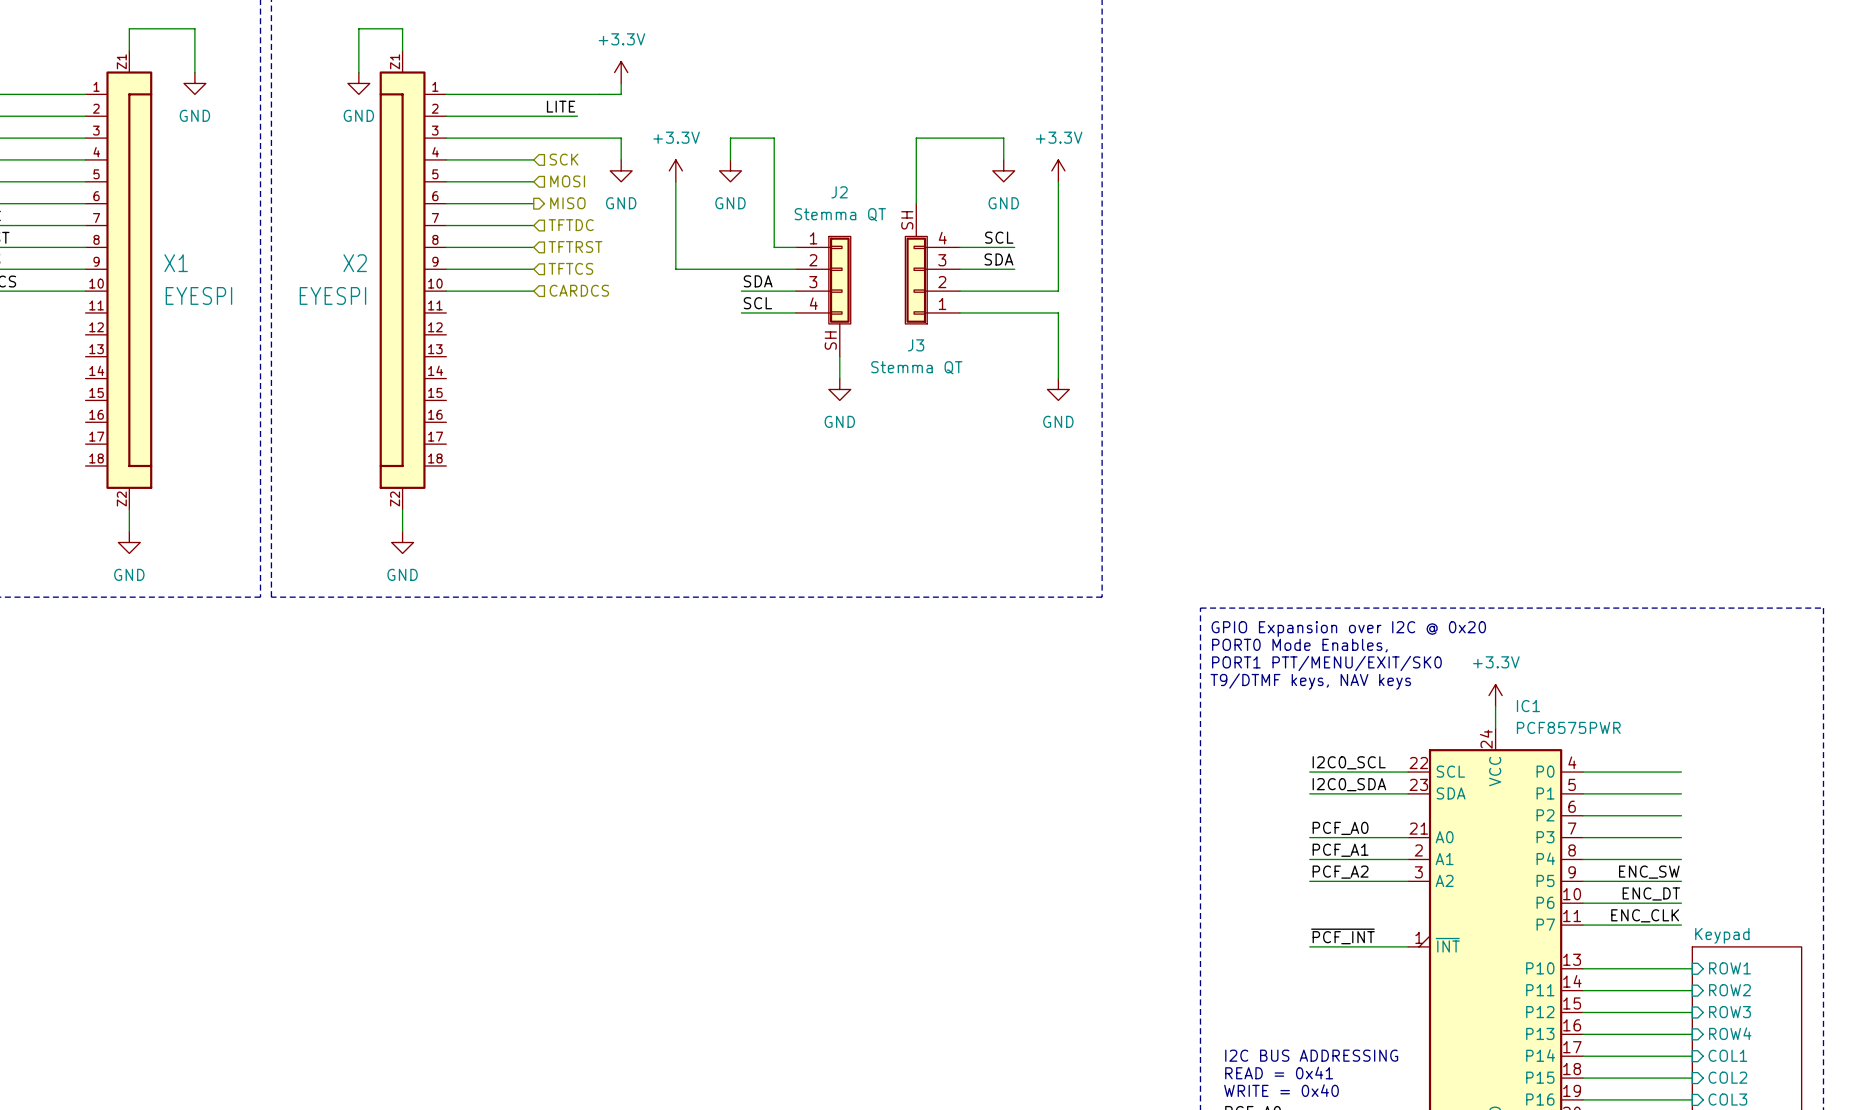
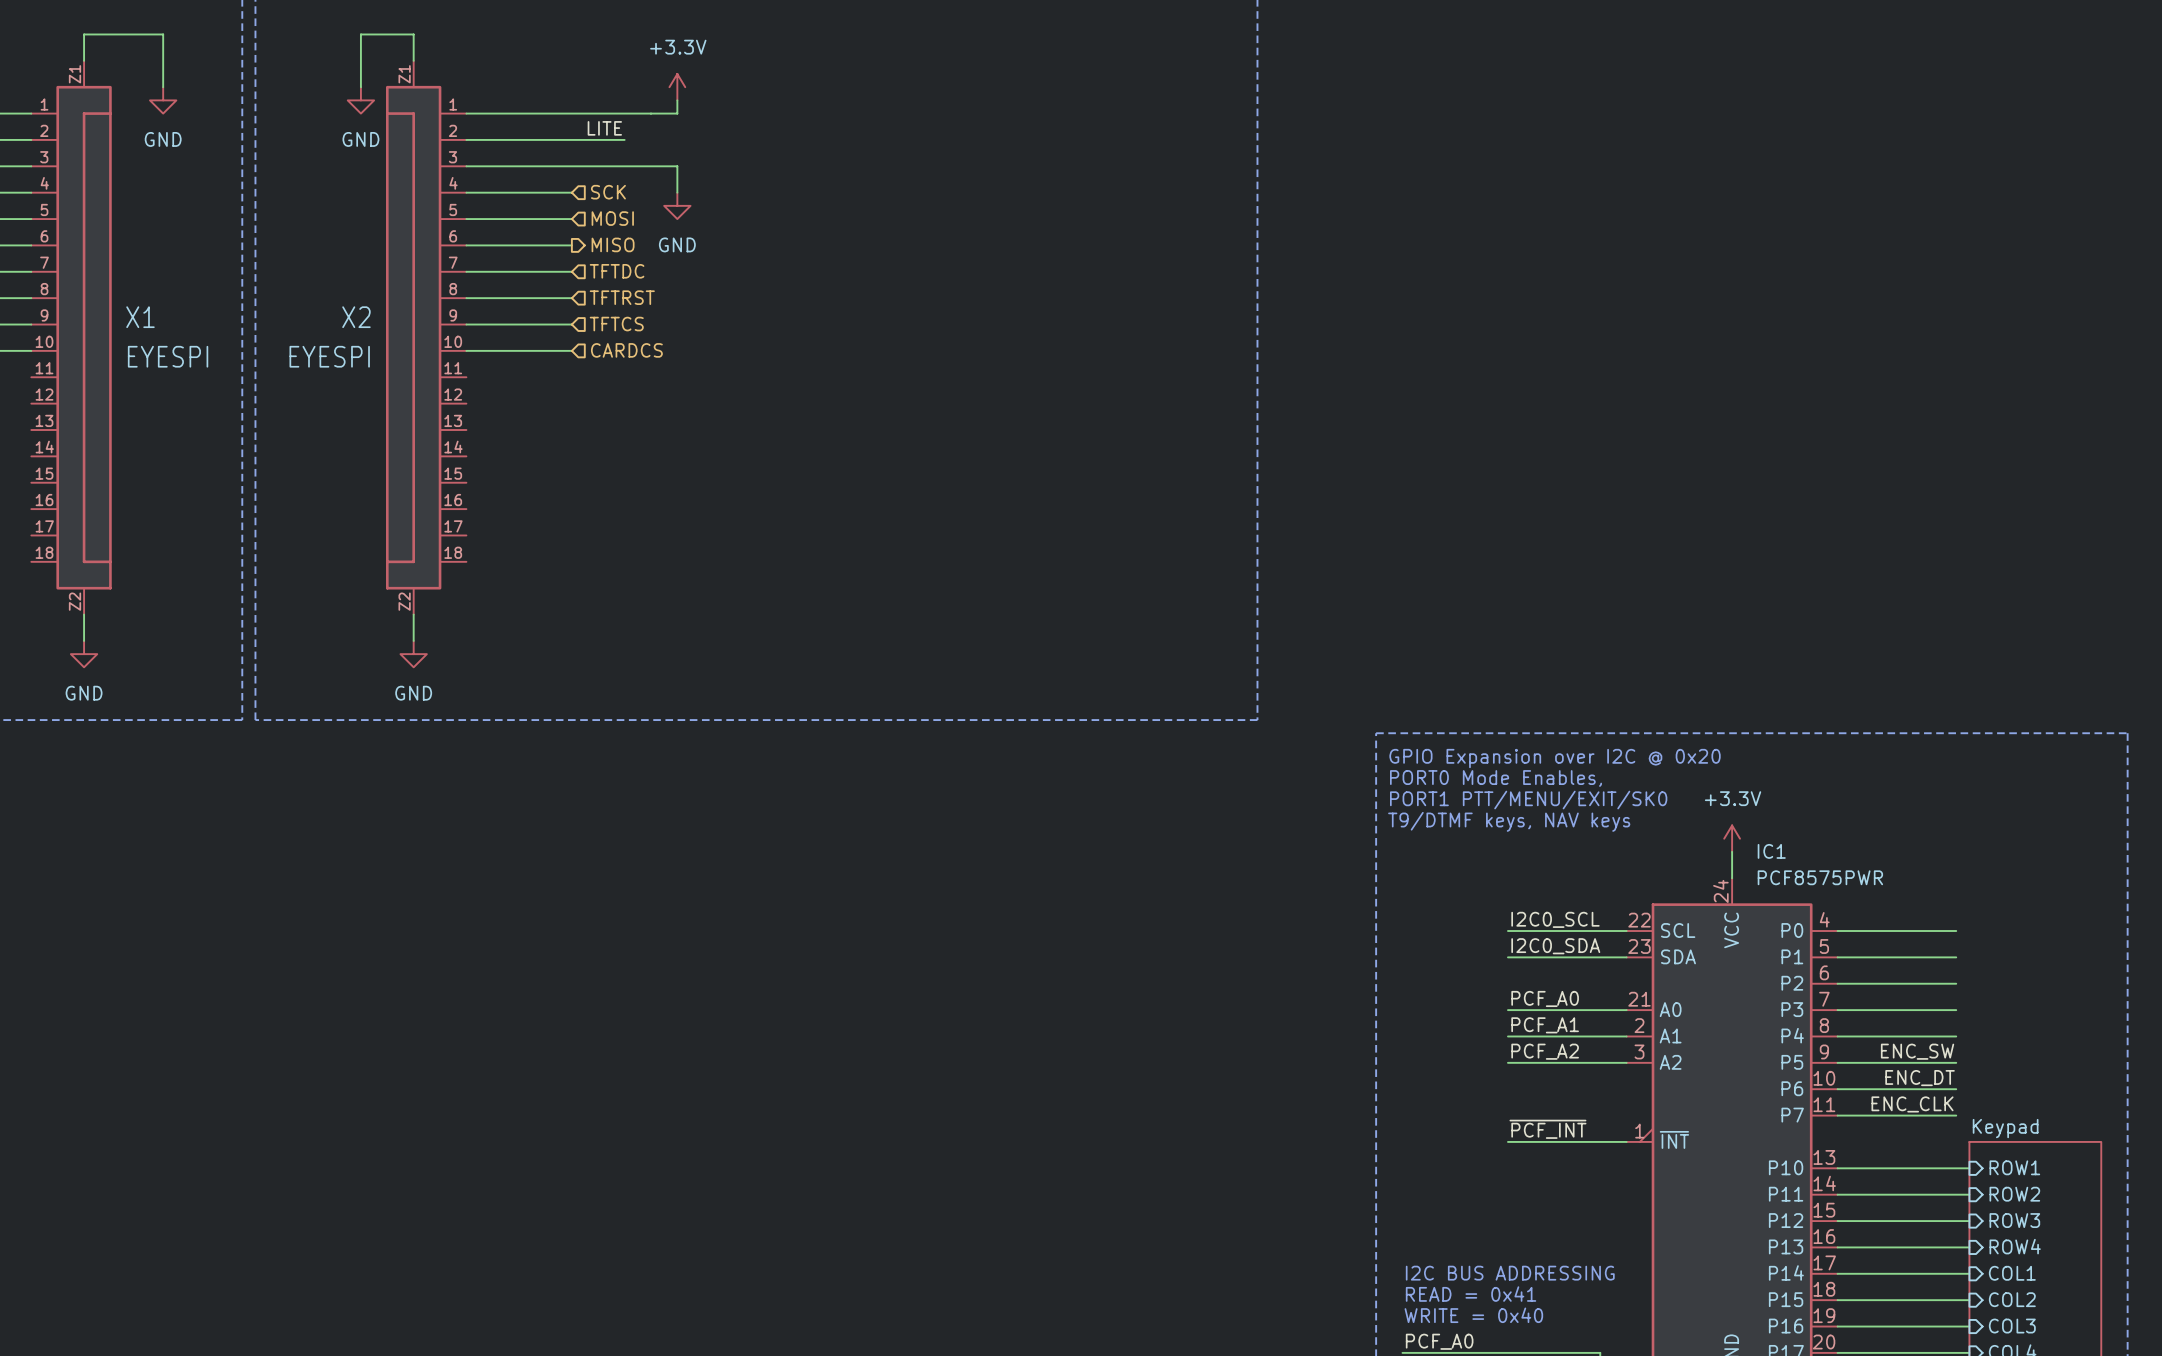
wire: (730, 159) (730, 138) (774, 138) (774, 247) (796, 247) -> none
wire: (1003, 159) (1003, 138) (916, 138) (916, 203) -> none
power symbol: +3.3V (675, 170) -> none
power symbol: GND (730, 170) -> none
power symbol: GND (1003, 170) -> none
power symbol: +3.3V (1058, 170) -> none
wire: (675, 181) (675, 269) (796, 269) -> none
wire: (1058, 181) (1058, 291) (960, 291) -> none
label: SCL (999, 237) -> none
wire: (960, 247) (1014, 247) -> none
label: SDA (998, 259) -> none
J3: Stemma QT (932, 264) -> none
wire: (960, 269) (1014, 269) -> none
label: SDA (758, 281) -> none
wire: (741, 291) (796, 291) -> none
J2: Stemma QT (823, 296) -> none
label: SCL (757, 303) -> none
wire: (741, 312) (796, 312) -> none
wire: (960, 312) (1058, 312) (1058, 378) -> none
wire: (839, 356) (839, 378) -> none
power symbol: GND (839, 389) -> none
power symbol: GND (1058, 389) -> none

